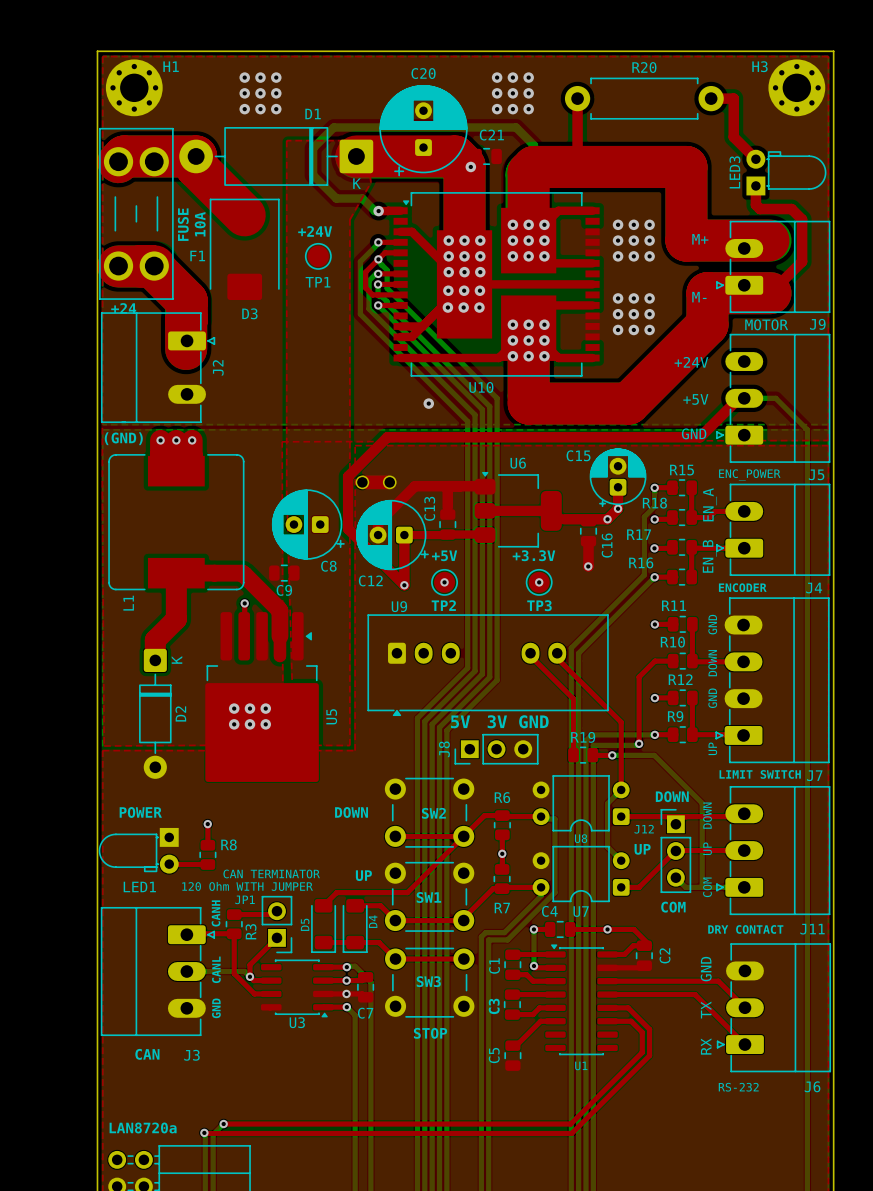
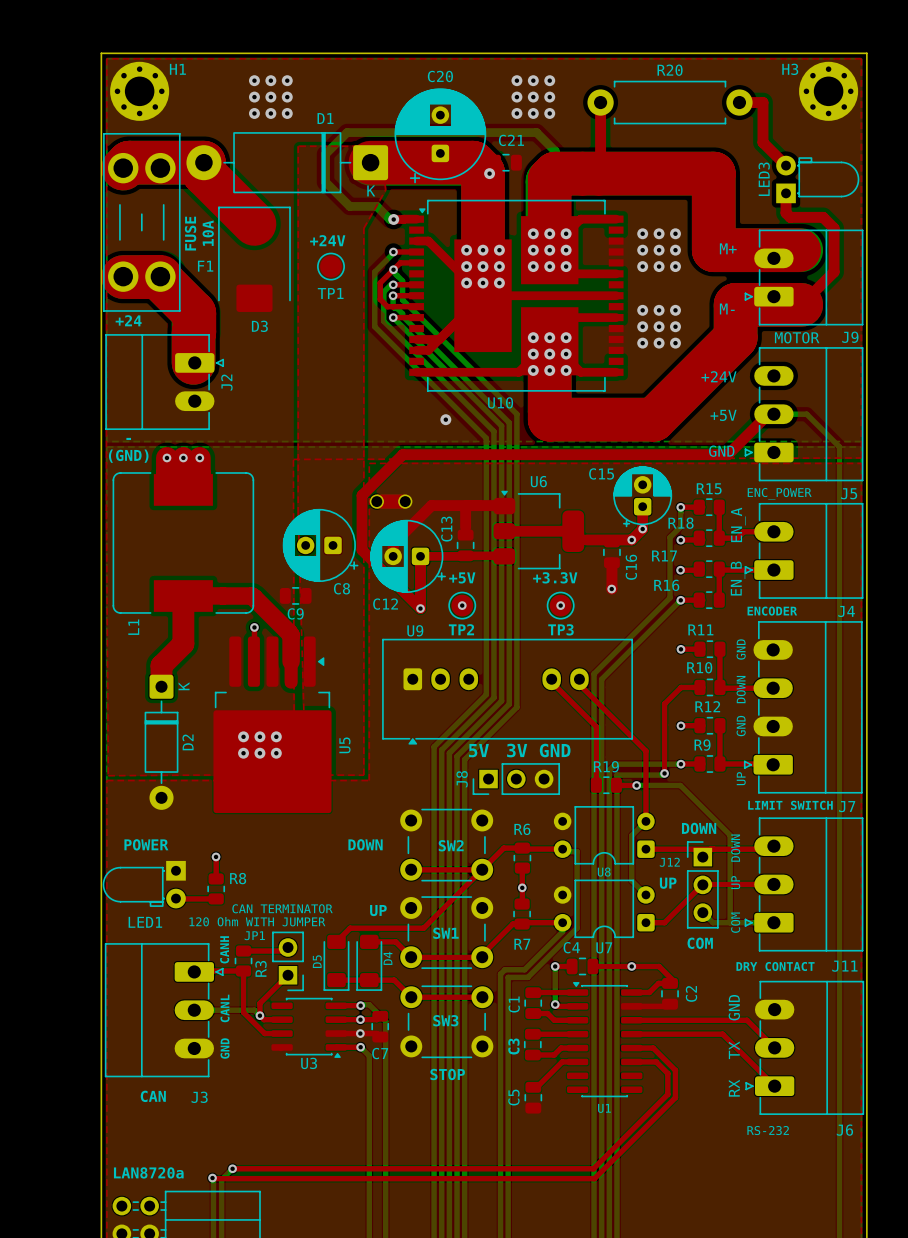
via: (448, 290) -> none
via: (464, 290) -> none
via: (479, 290) -> none
via: (447, 307) -> none
via: (463, 307) -> none
via: (479, 307) -> none
J2 footprint: [101, 312, 216, 423] -> [105, 334, 224, 430]

